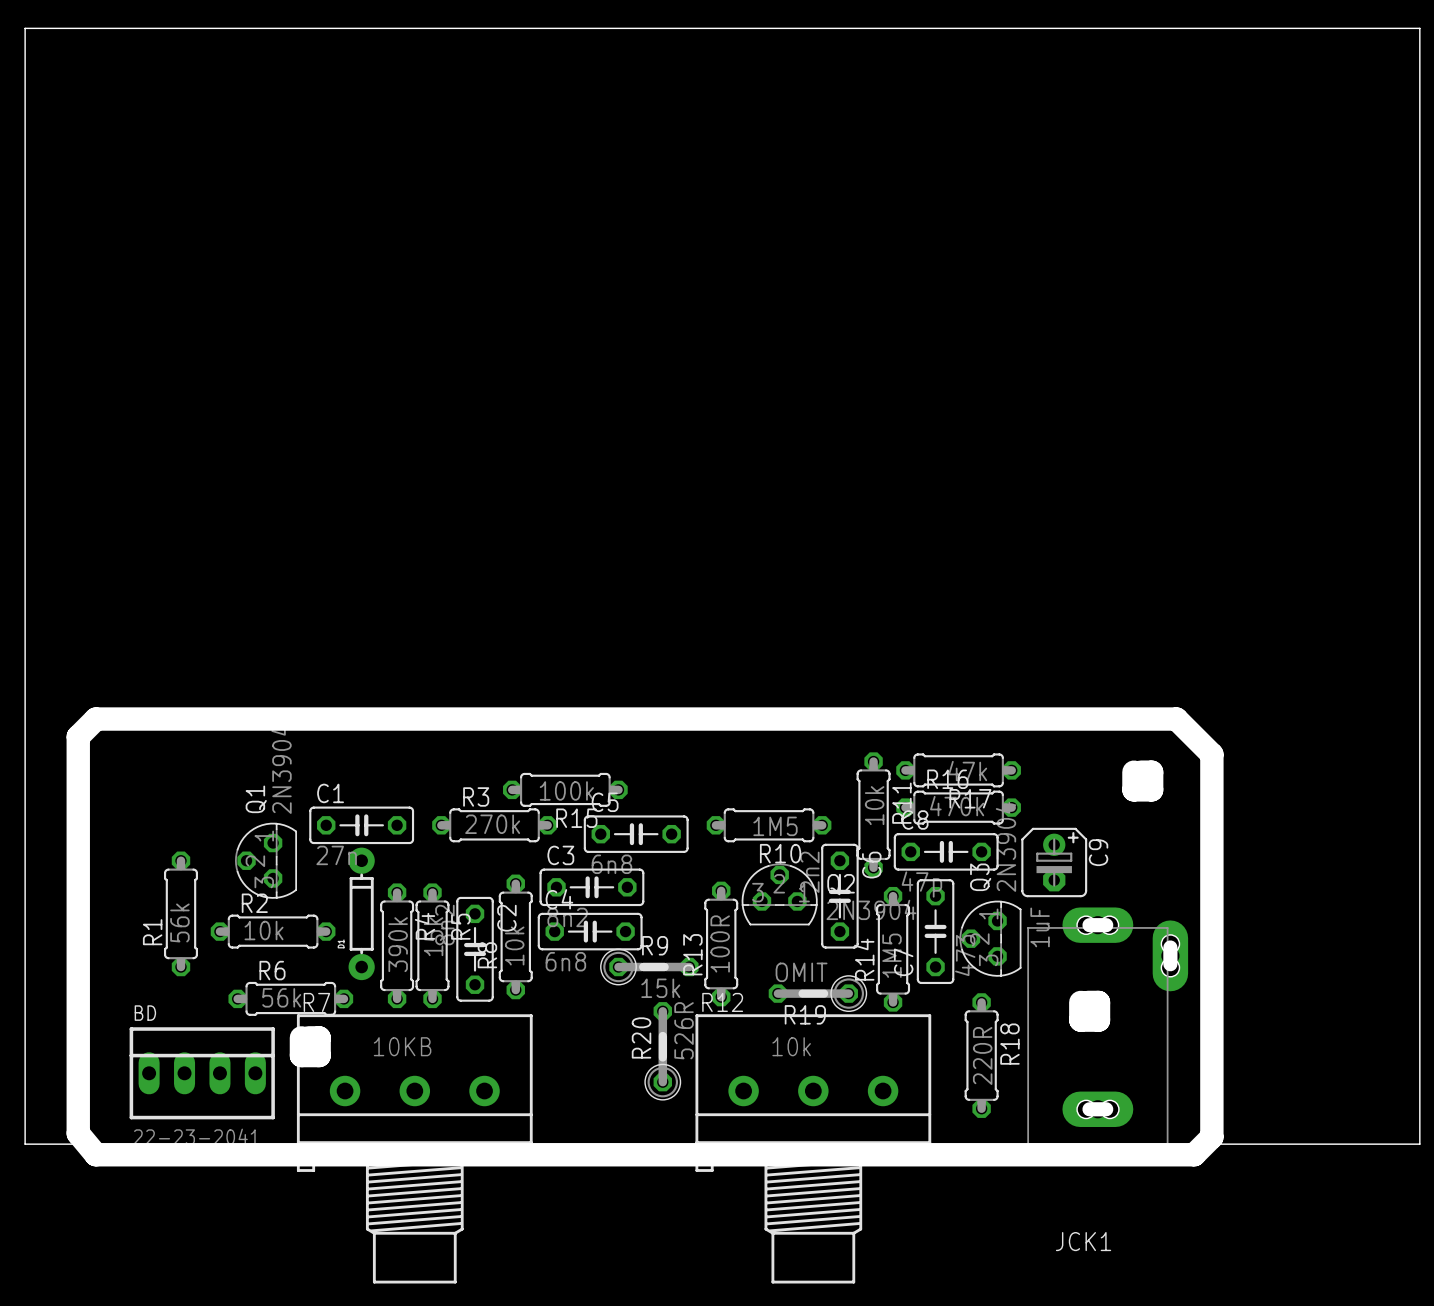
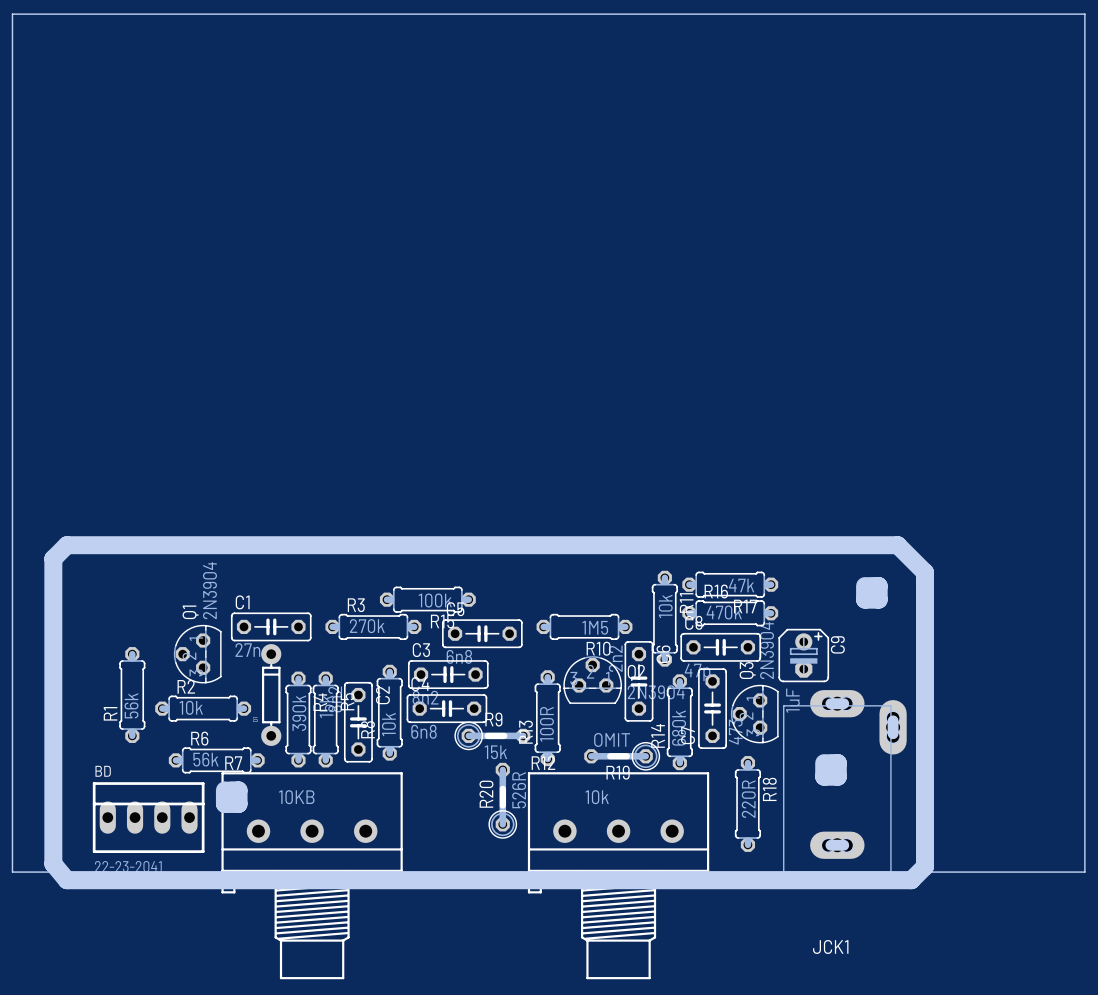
R14 value: 1M5 (891, 955) -> 680k (679, 728)

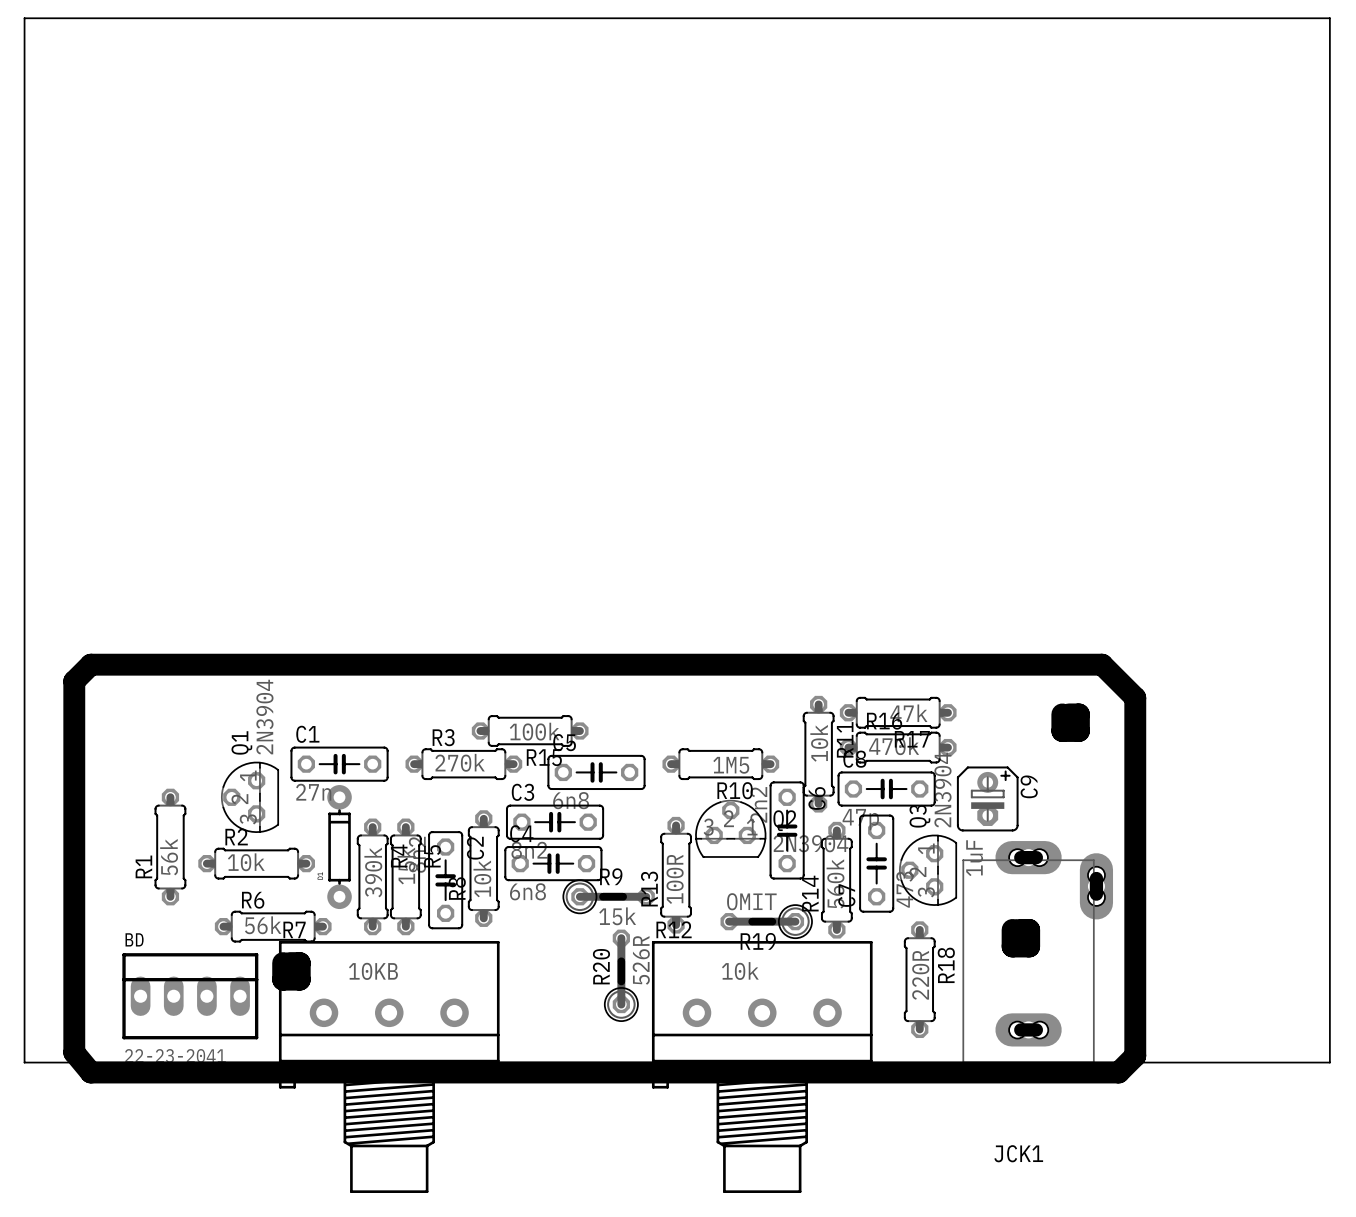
R14 value: 680k (679, 728) -> 560k (835, 883)

